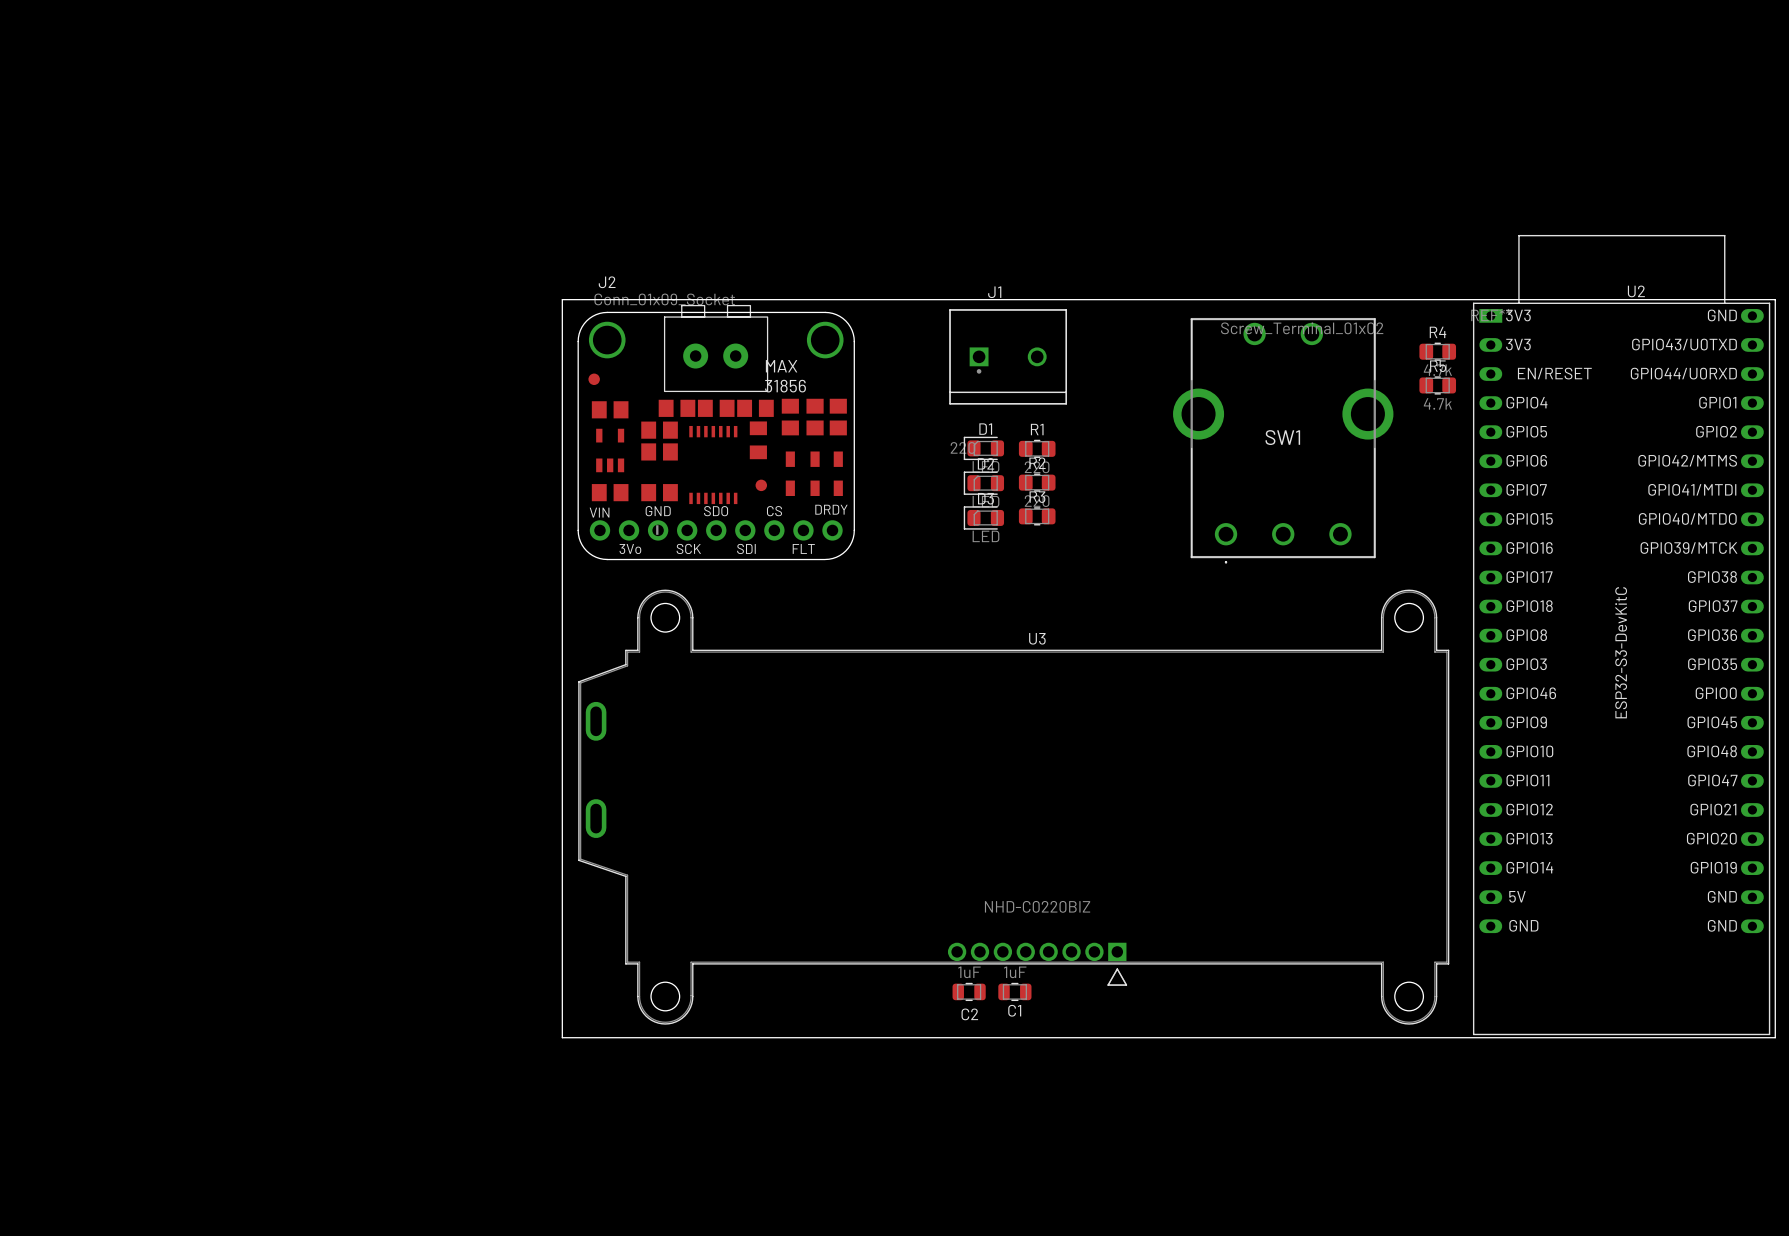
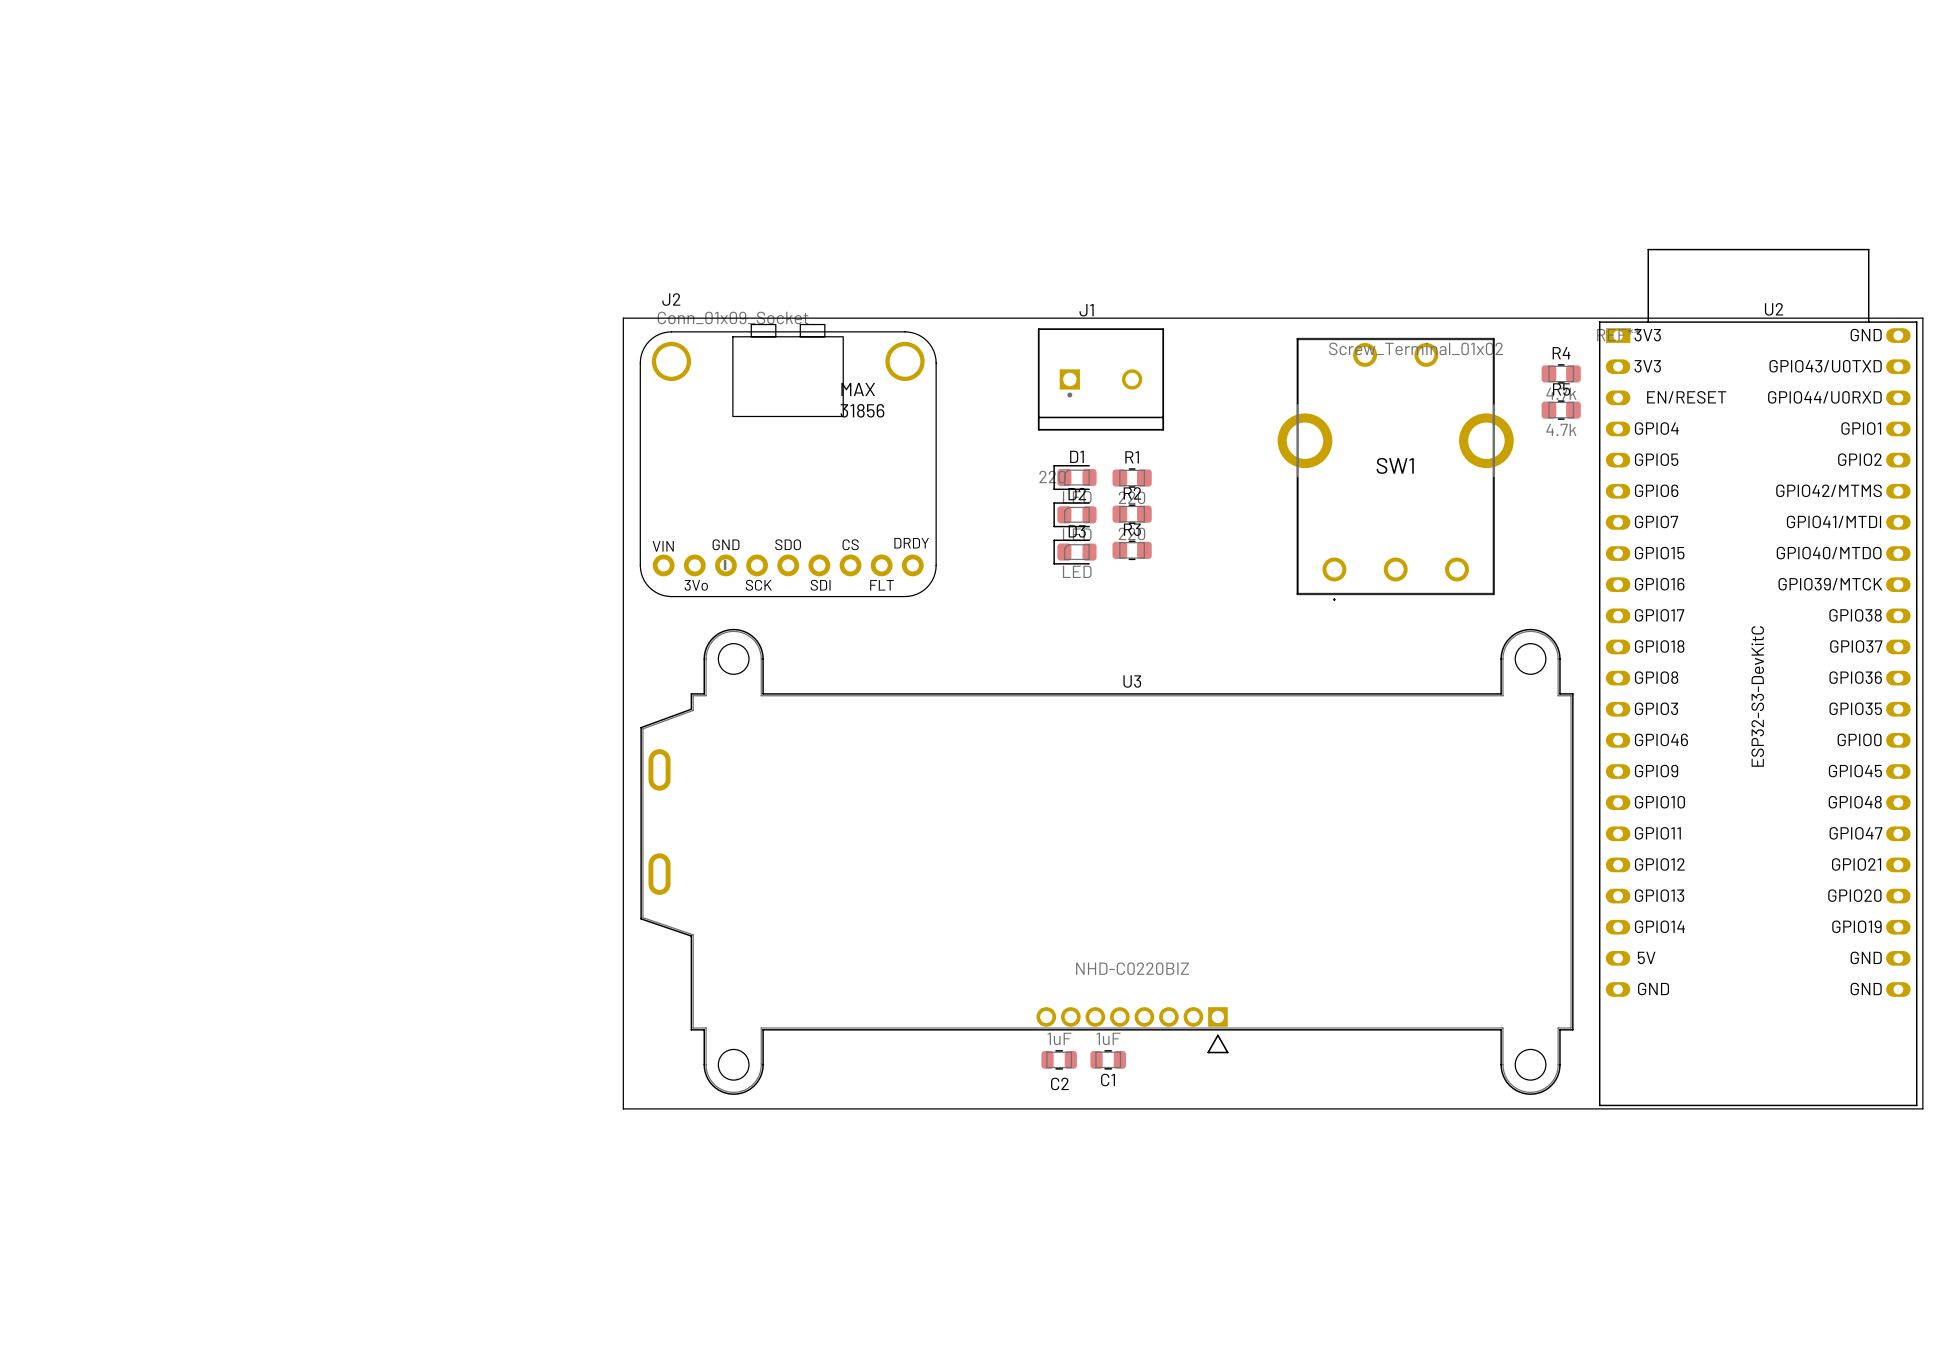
J2 footprint: [577, 305, 855, 560] -> [640, 323, 937, 597]

